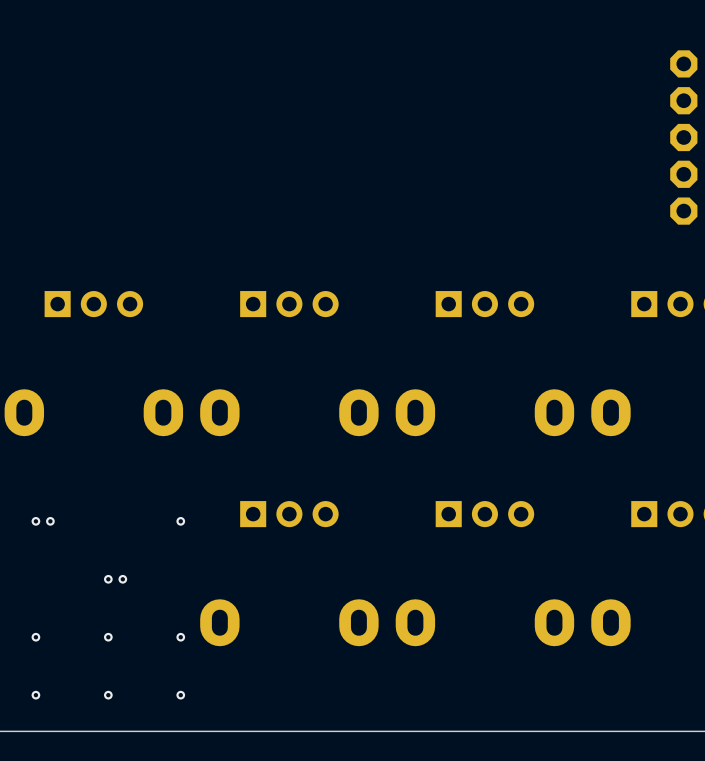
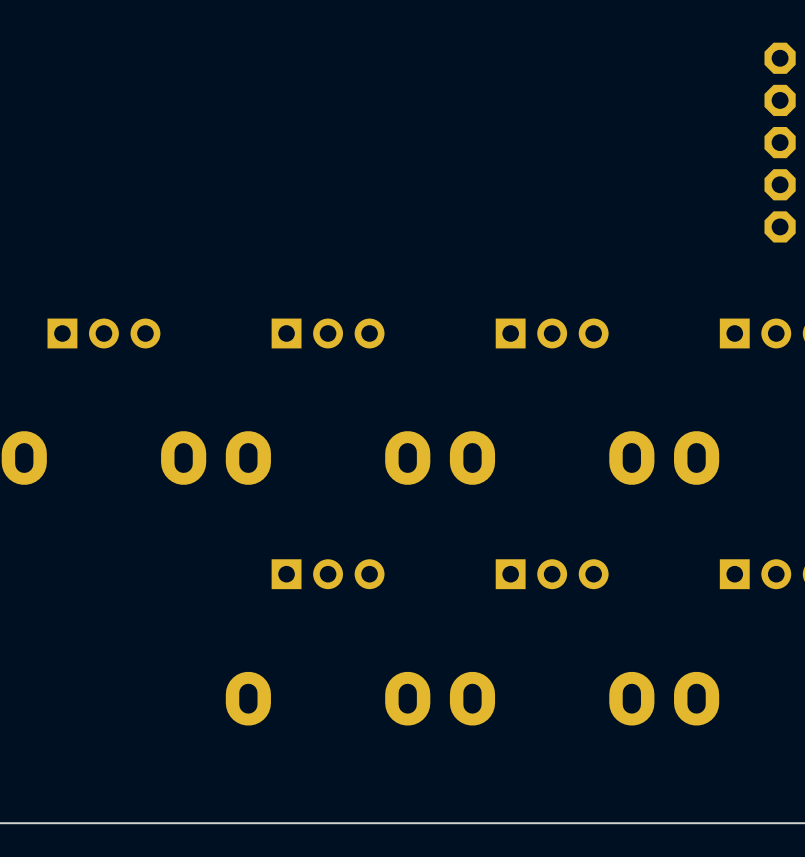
via: (35, 521) -> none
via: (50, 521) -> none
via: (180, 521) -> none
via: (108, 579) -> none
via: (122, 579) -> none
via: (35, 637) -> none
via: (108, 637) -> none
via: (180, 637) -> none
via: (35, 695) -> none
via: (108, 695) -> none
via: (180, 695) -> none

